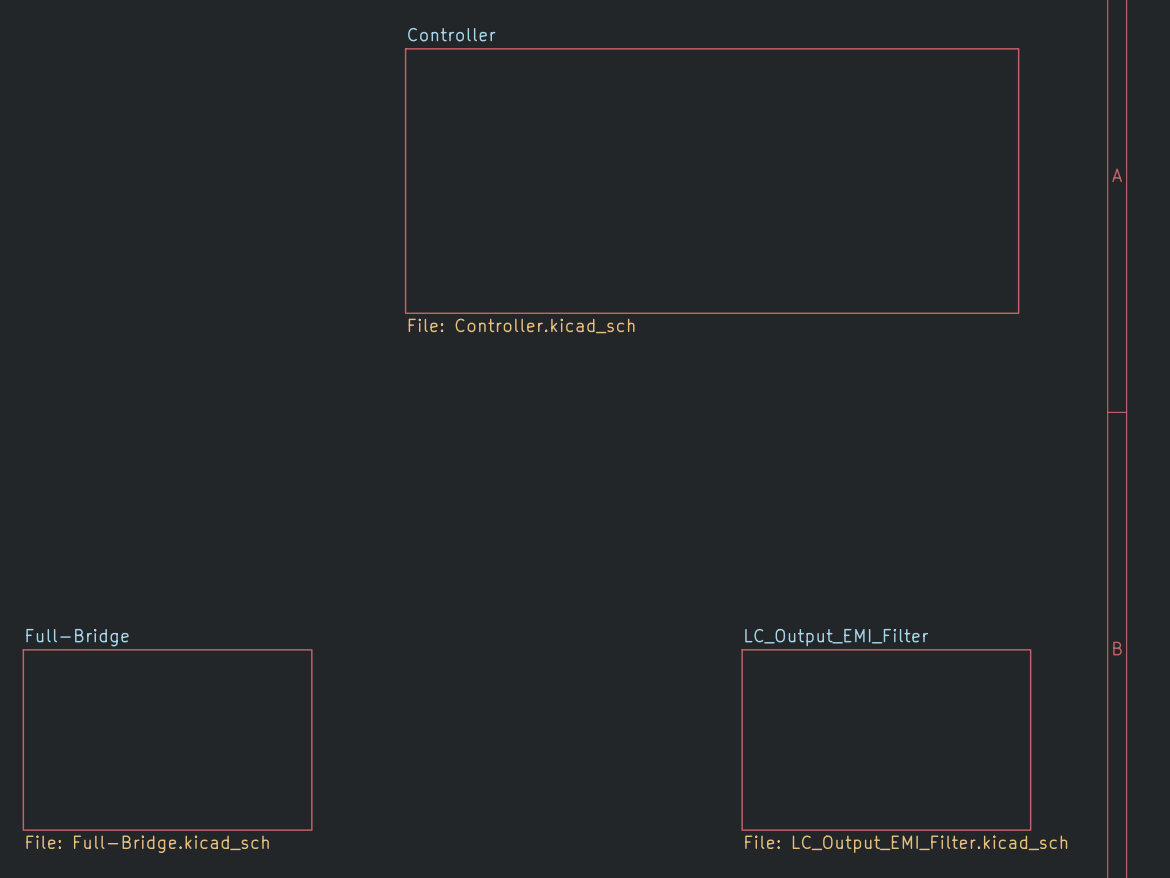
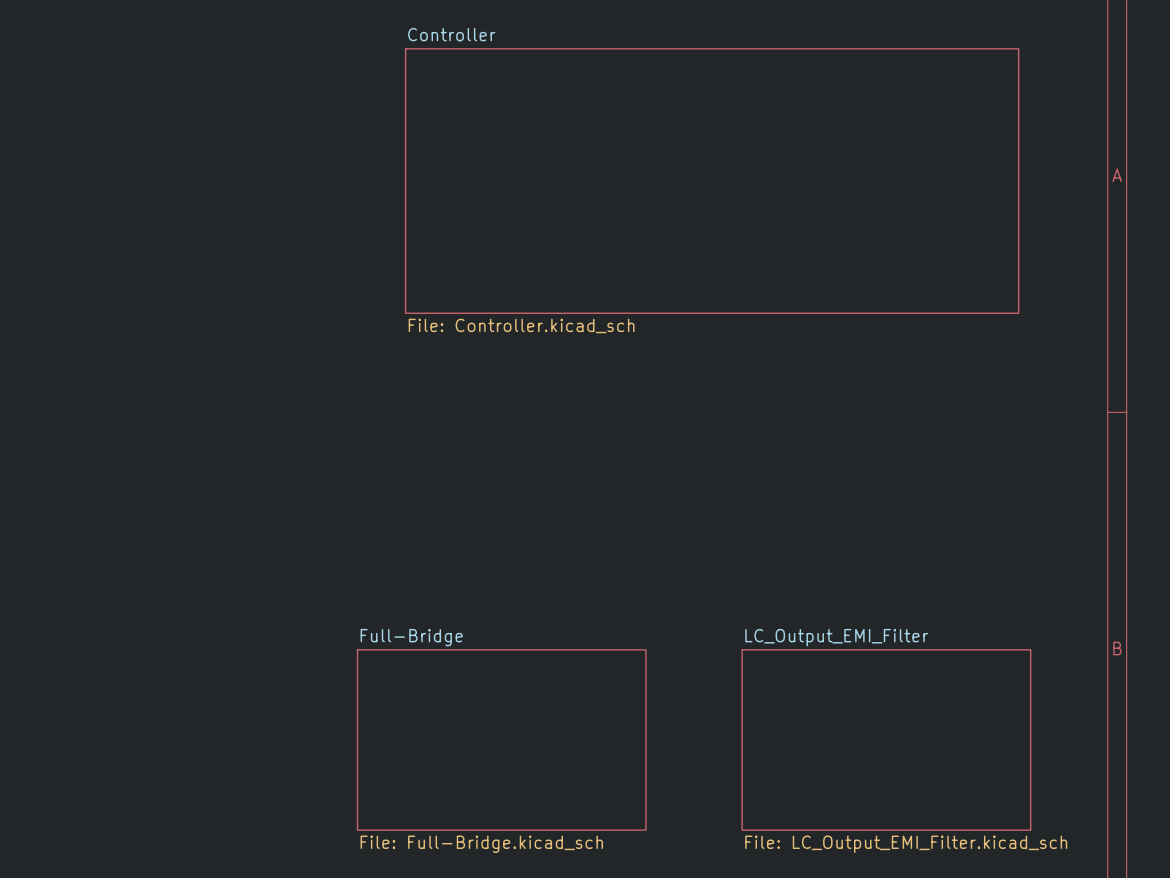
sheet Full-Bridge: File: Full-Bridge.kicad_sch (167, 740) -> none
sheet Full-Bridge: none -> File: Full-Bridge.kicad_sch (501, 740)

